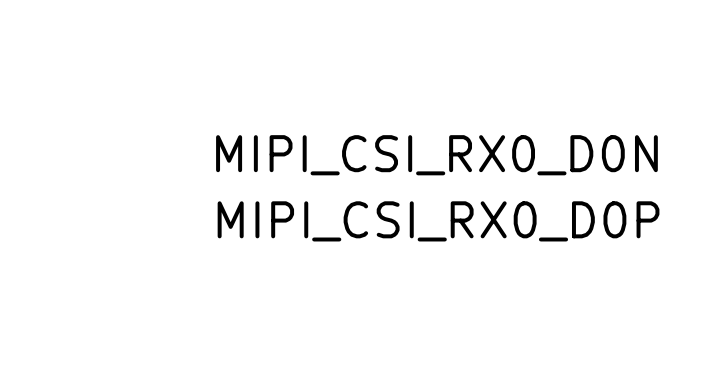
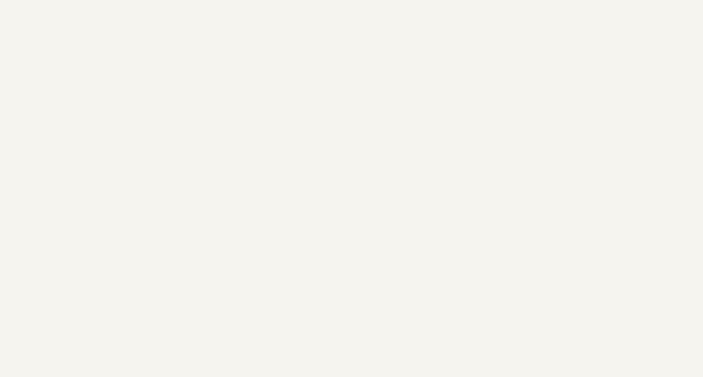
label: MIPI_CSI_RX0_D0N (436, 155) -> none
label: MIPI_CSI_RX0_D0P (438, 221) -> none

